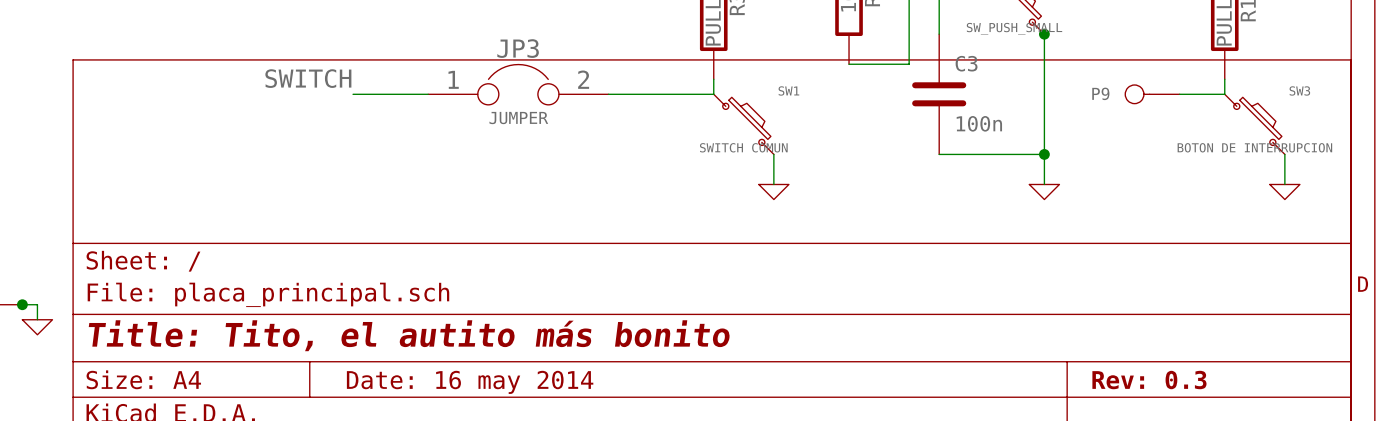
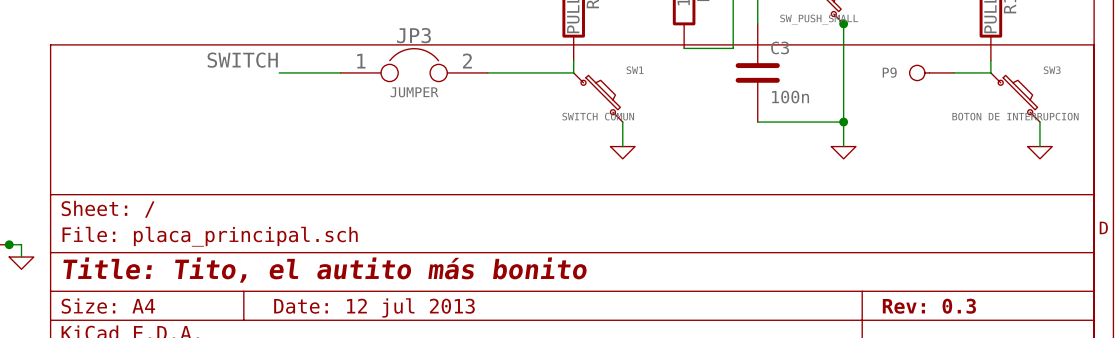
title block: Date: 16 may 2014 (470, 382) -> Date: 12 jul 2013 (374, 307)

